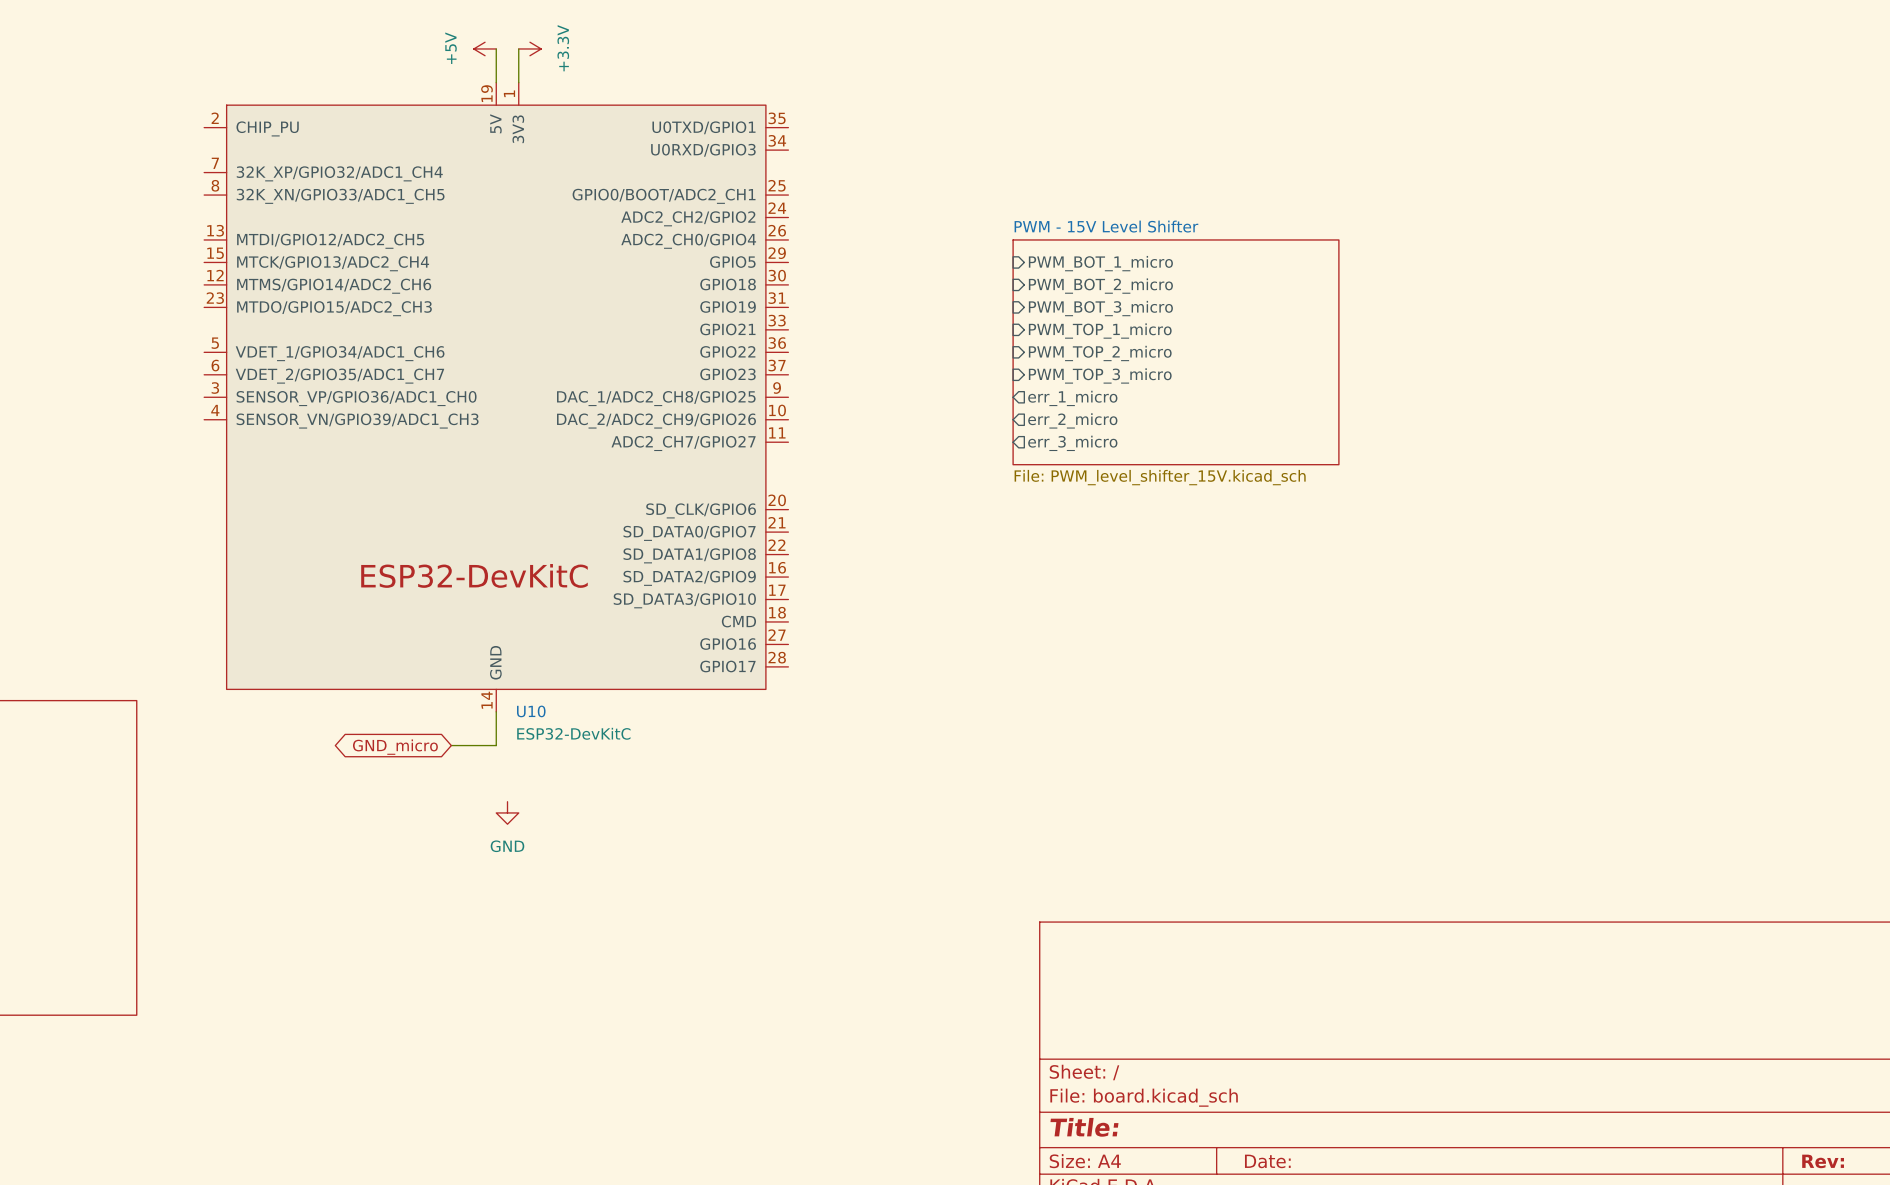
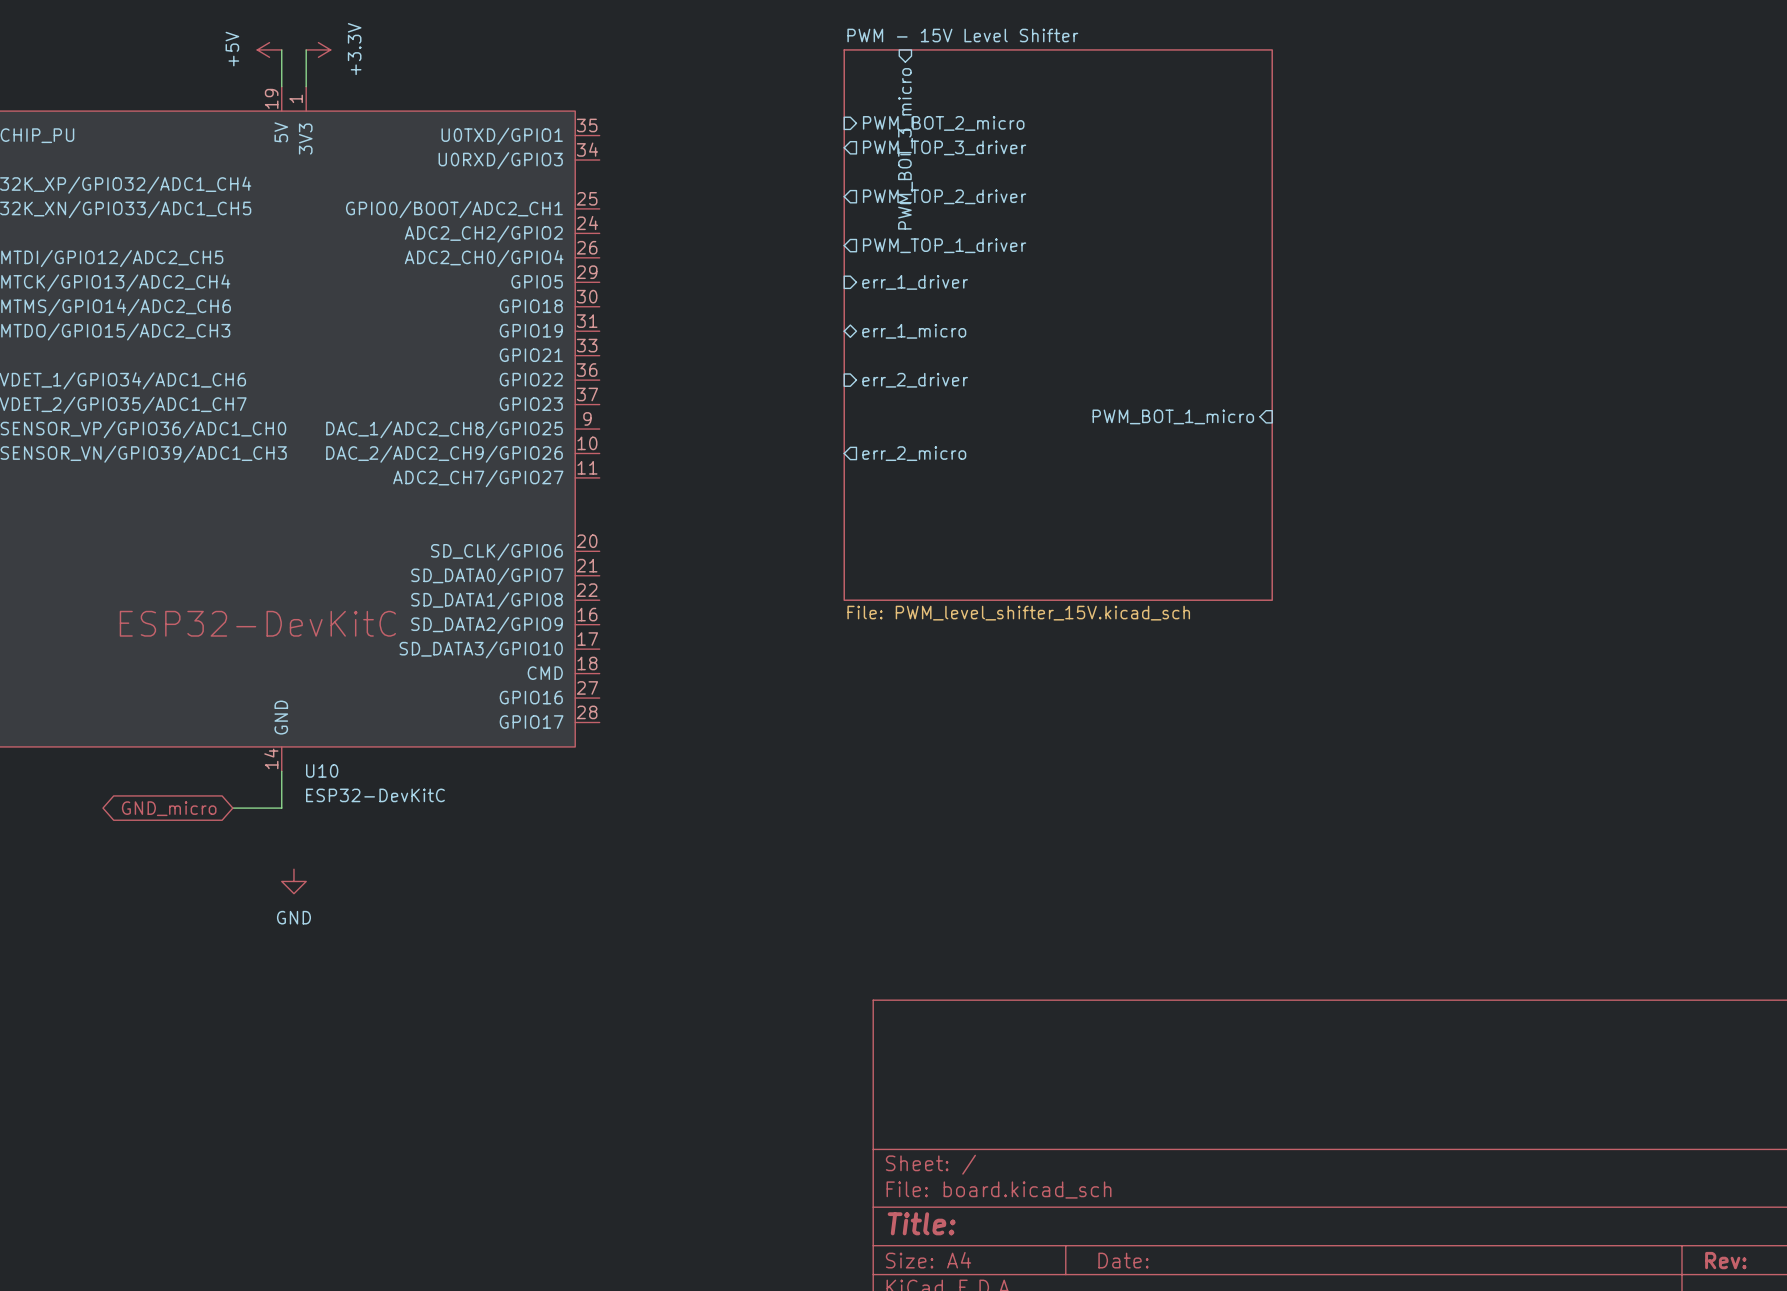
sheet pin: none -> PWM_BOT_3_micro (905, 148)
sheet pin: none -> PWM_TOP_3_driver (944, 147)
sheet pin: none -> PWM_TOP_2_driver (944, 196)
sheet PWM - 15V Level Shifter name position: PWM - 15V Level Shifter (1106, 226) -> PWM - 15V Level Shifter (962, 35)
sheet pin: none -> PWM_TOP_1_driver (944, 245)
sheet PWM - 15V Level Shifter shape: [1012, 239, 1340, 466] -> [843, 49, 1273, 601]
sheet pin: PWM_BOT_1_micro (1100, 263) -> err_1_driver (915, 282)
sheet pin position: PWM_BOT_2_micro (1100, 286) -> PWM_BOT_2_micro (943, 123)
sheet pin shape: input (1100, 308) -> bidirectional (914, 331)
sheet pin: PWM_BOT_3_micro (1100, 308) -> err_1_micro (914, 331)
sheet pin: PWM_TOP_1_micro (1100, 331) -> none
sheet pin: PWM_TOP_2_micro (1100, 353) -> err_2_driver (915, 380)
sheet pin: PWM_TOP_3_micro (1100, 375) -> none
sheet pin: none -> PWM_BOT_1_micro (1173, 416)
sheet pin: err_1_micro (1072, 398) -> none
sheet pin: err_3_micro (1072, 443) -> none
sheet PWM - 15V Level Shifter value position: File: PWM_level_shifter_15V.kicad_sch (1160, 477) -> File: PWM_level_shifter_15V.kicad_sch (1018, 613)

